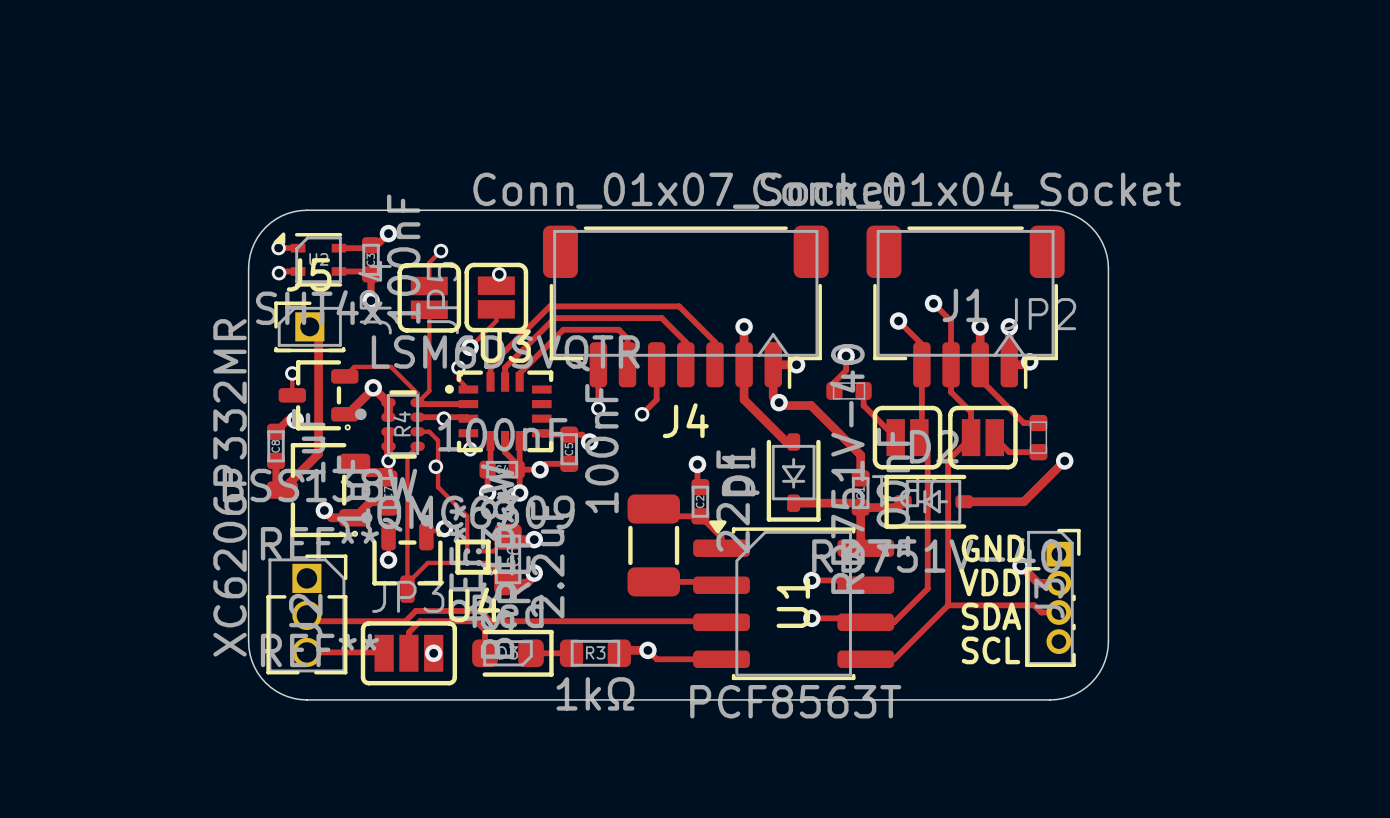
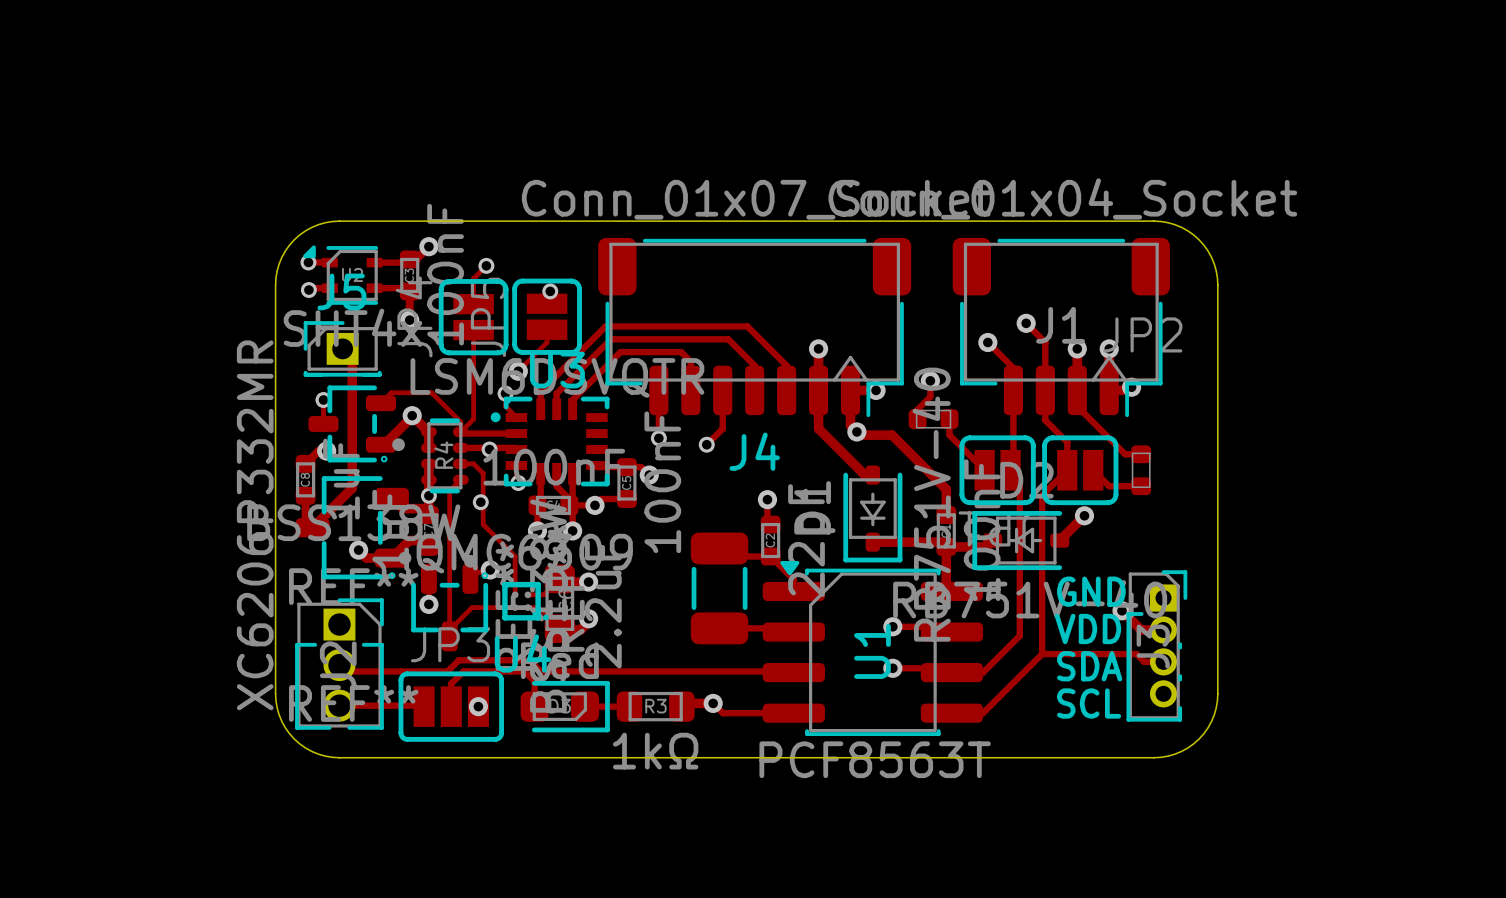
track: (1064, 460) (1023, 501) (964, 501) -> (1084, 515) (1059, 540)
via position: (1064, 460) -> (1084, 515)

